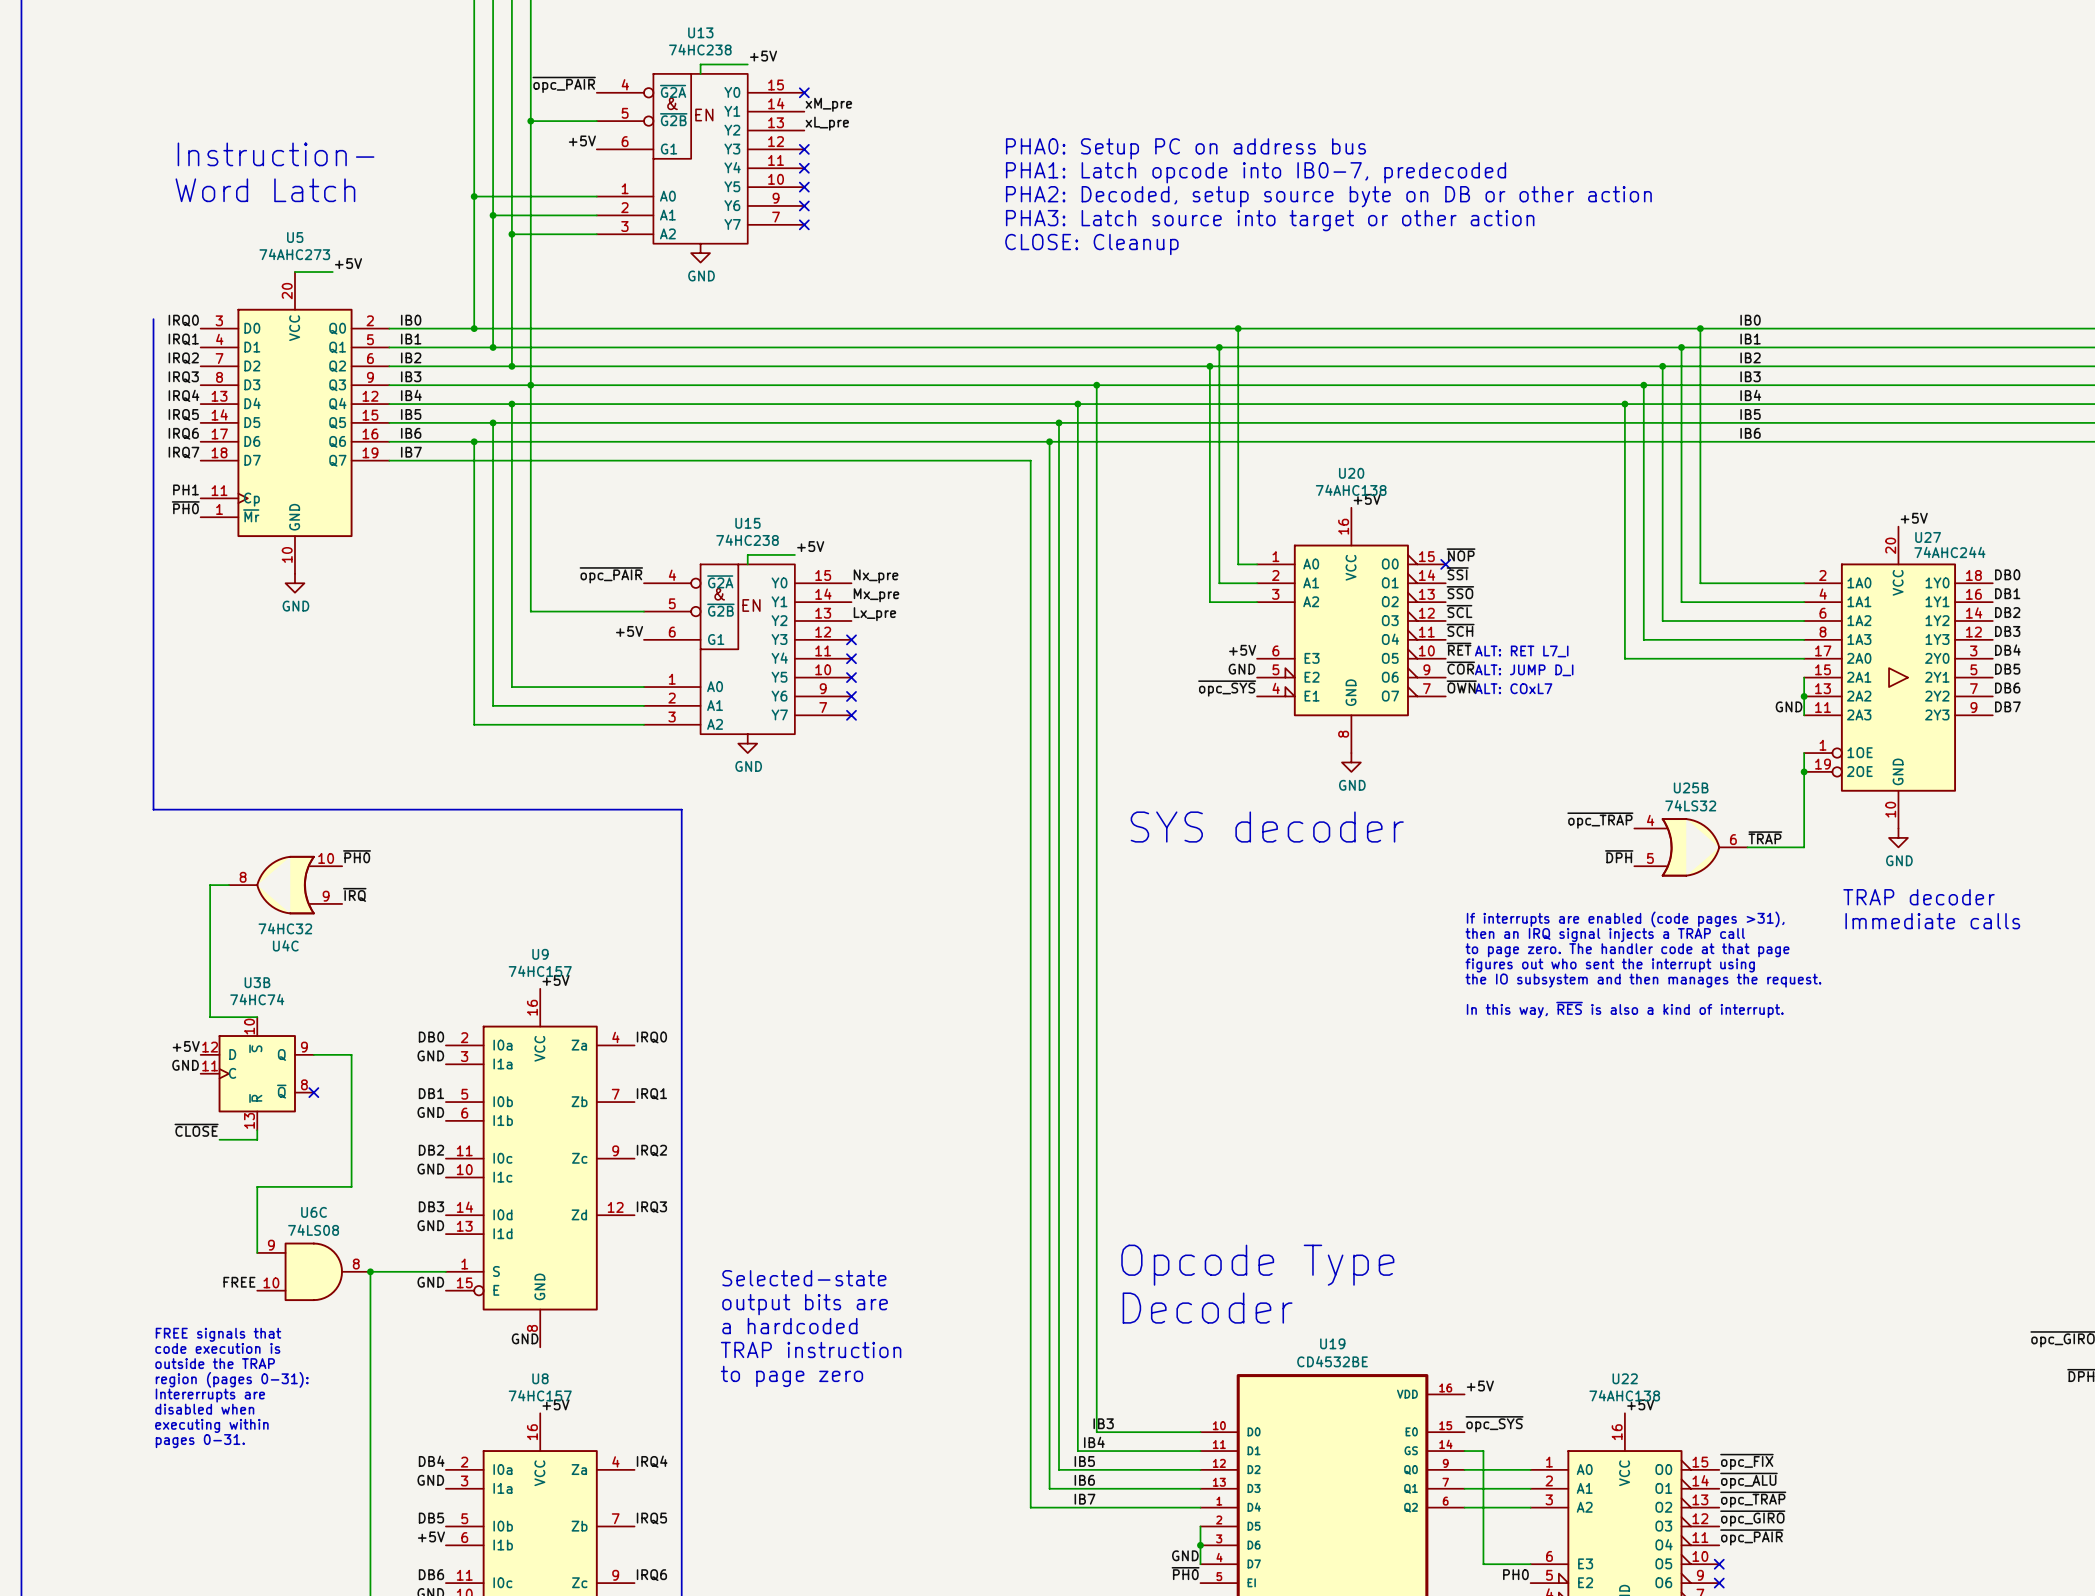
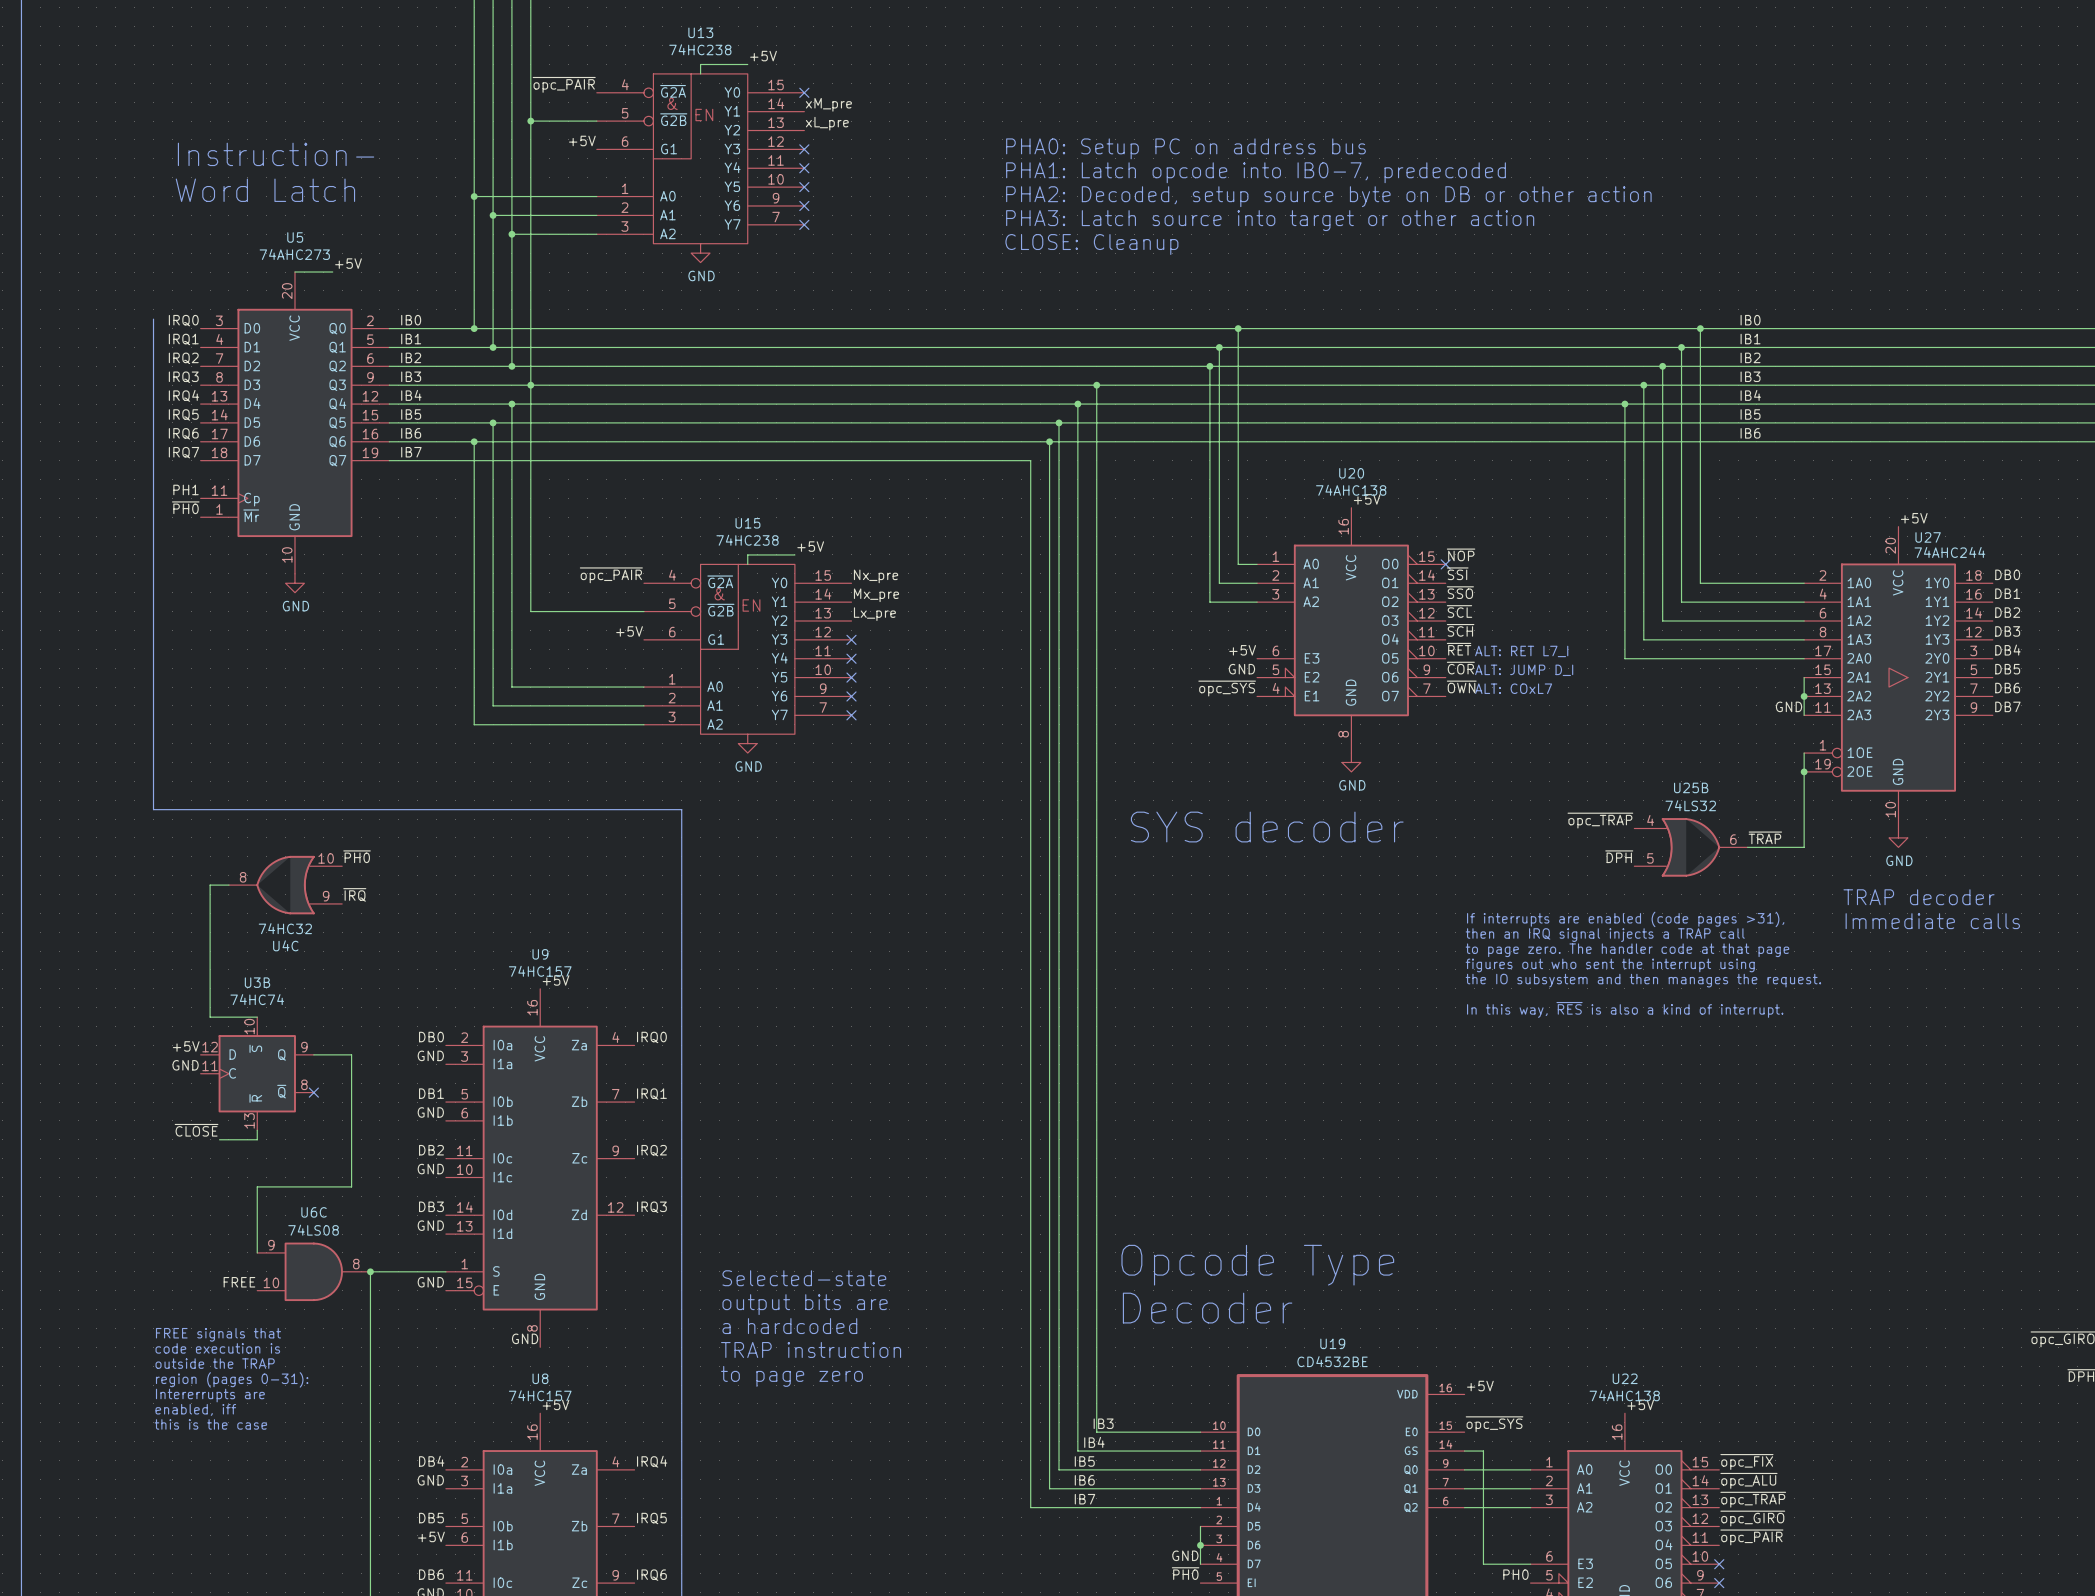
text: disabled when (204, 1409) -> enabled, iff (195, 1409)
text: executing within (211, 1425) -> this is the case (210, 1424)
text: pages 0-31. (200, 1441) -> none

